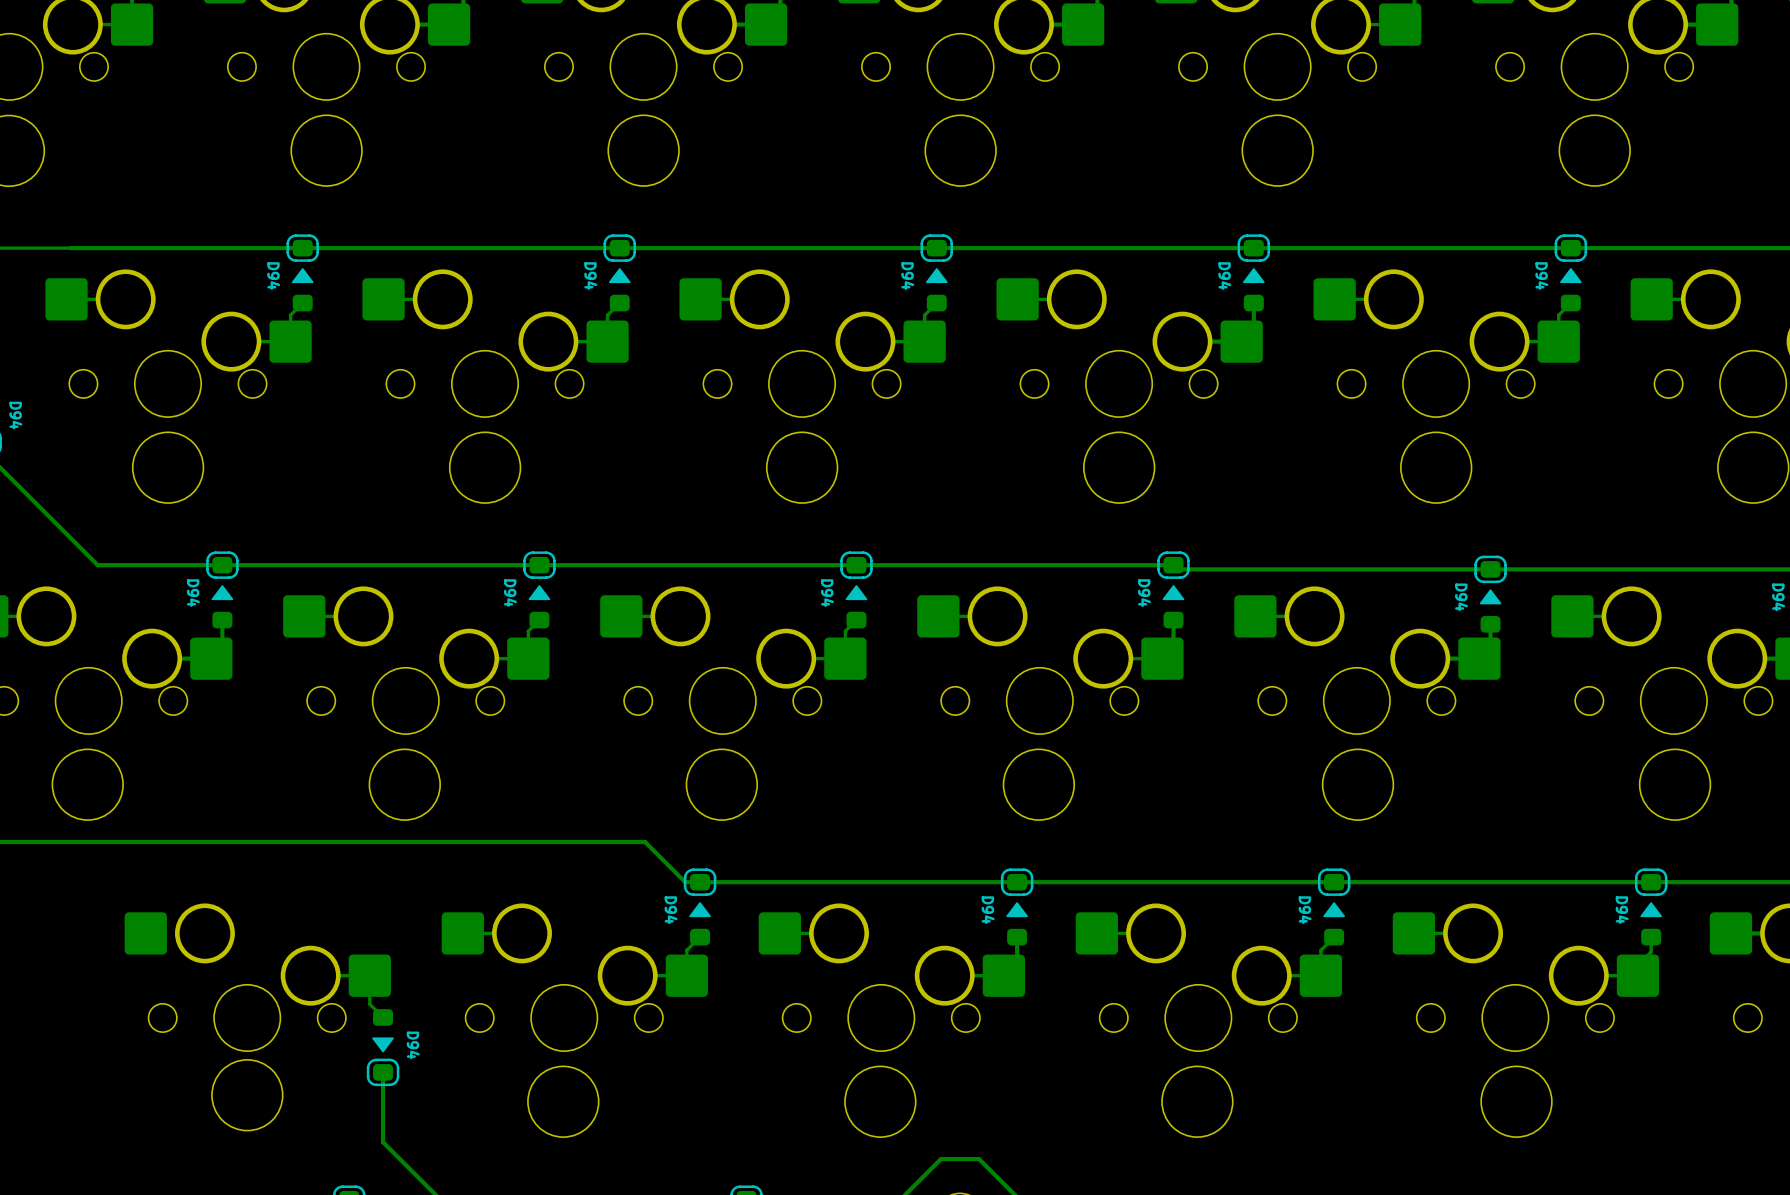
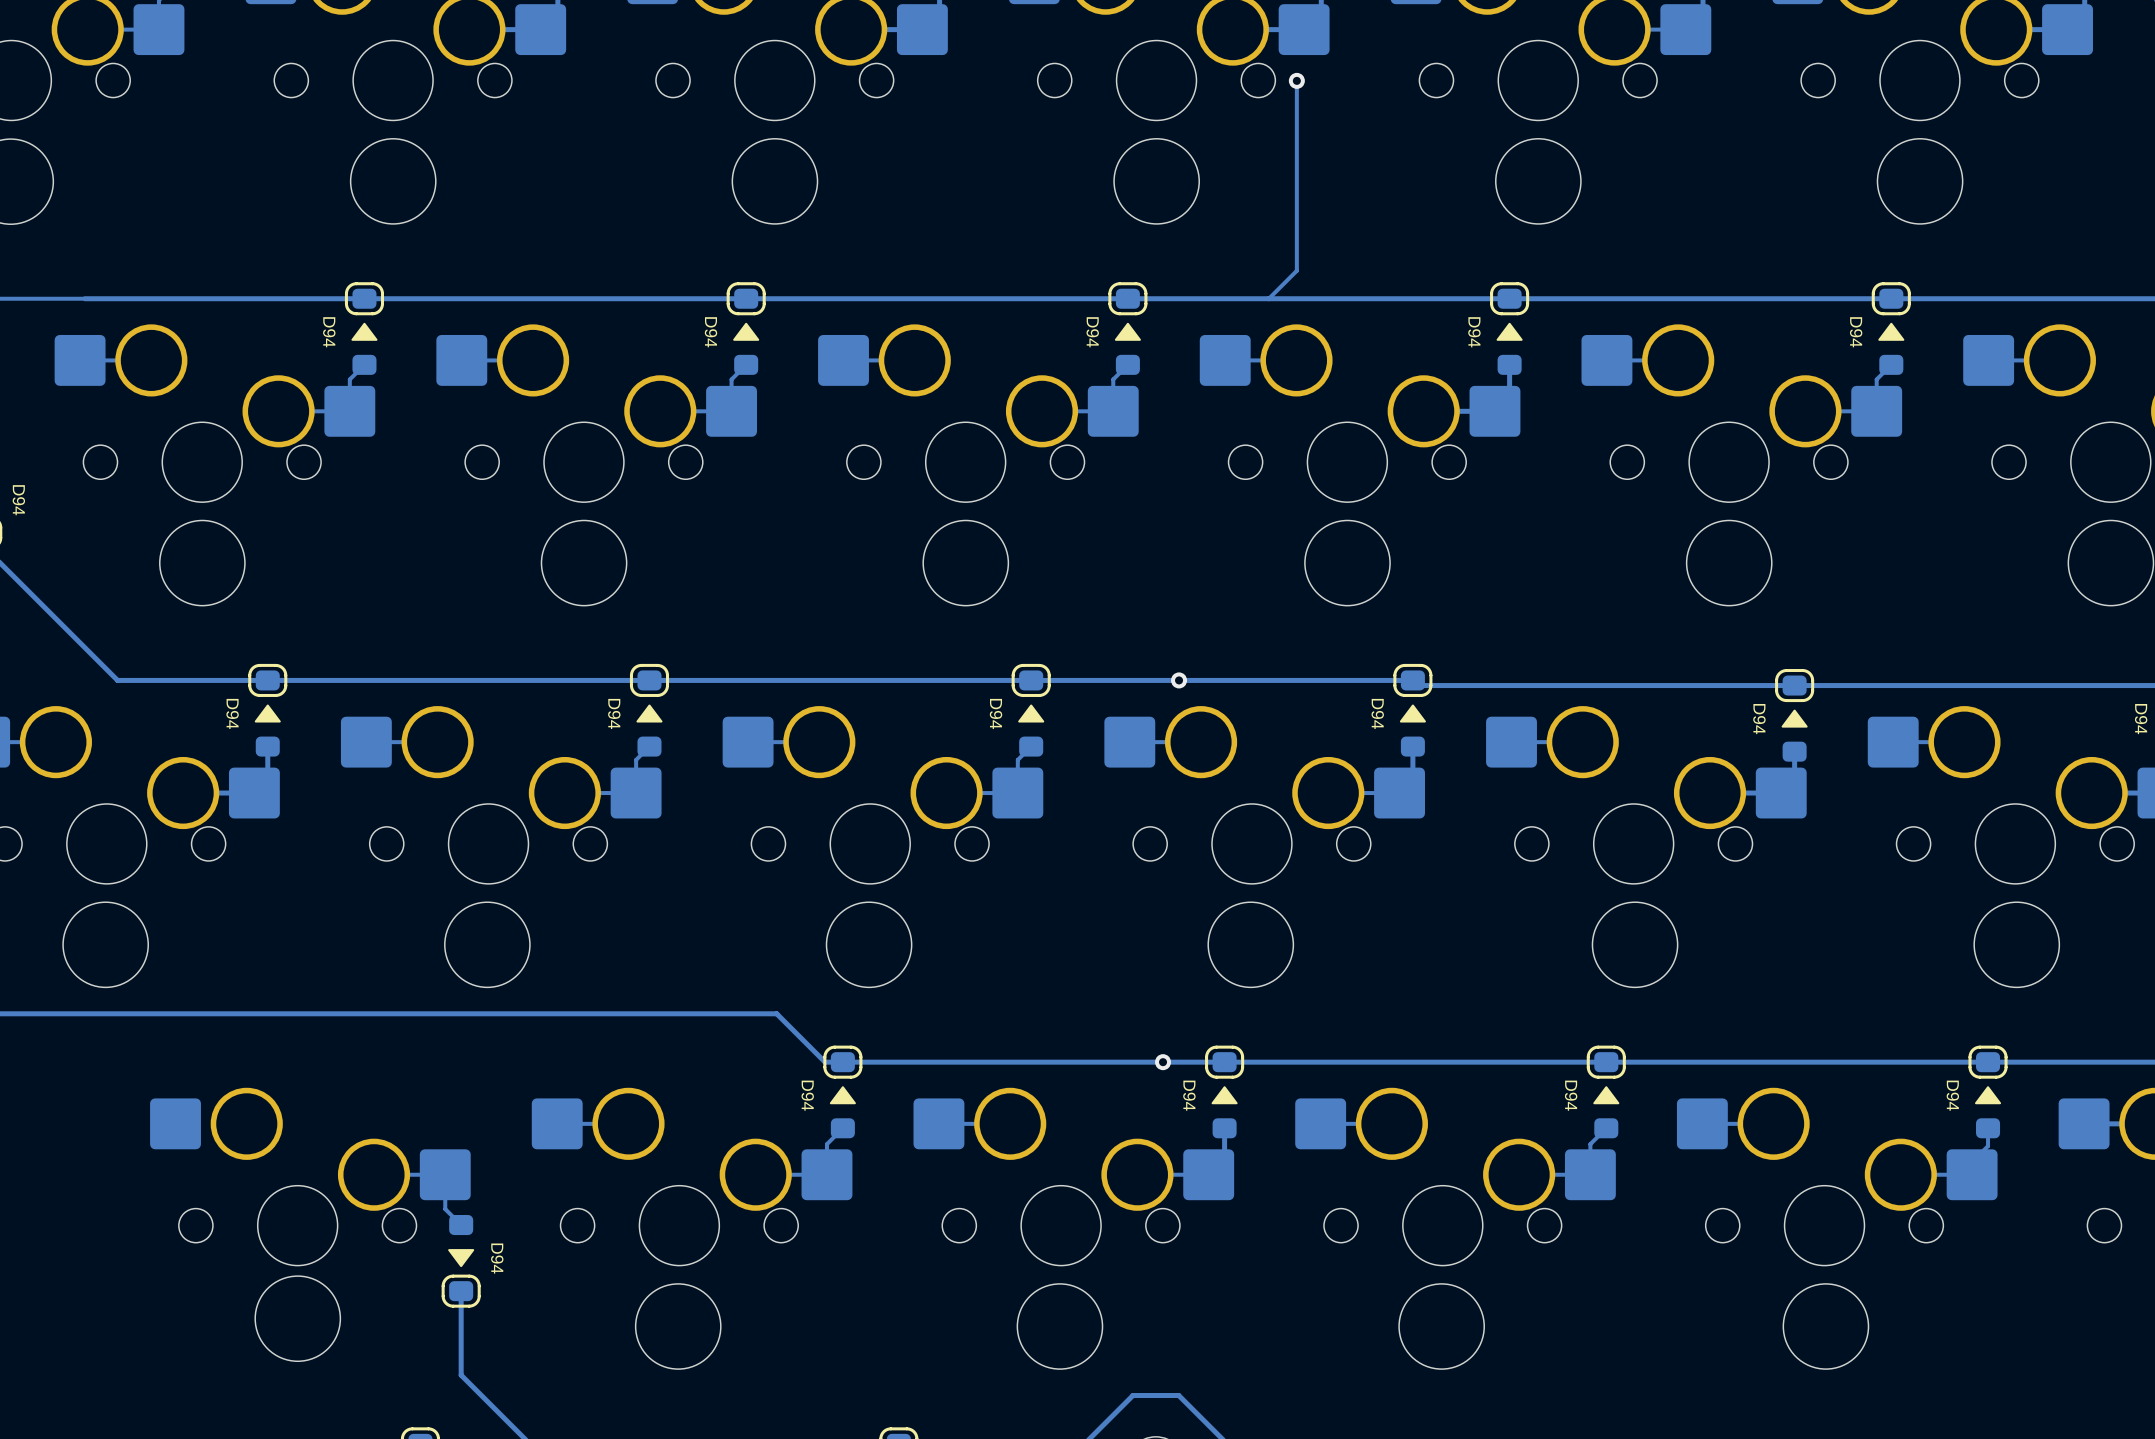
track: none -> (1296, 80) (1296, 270) (1268, 298)
via: none -> (1296, 80)
via: none -> (1179, 680)
via: none -> (1163, 1062)

